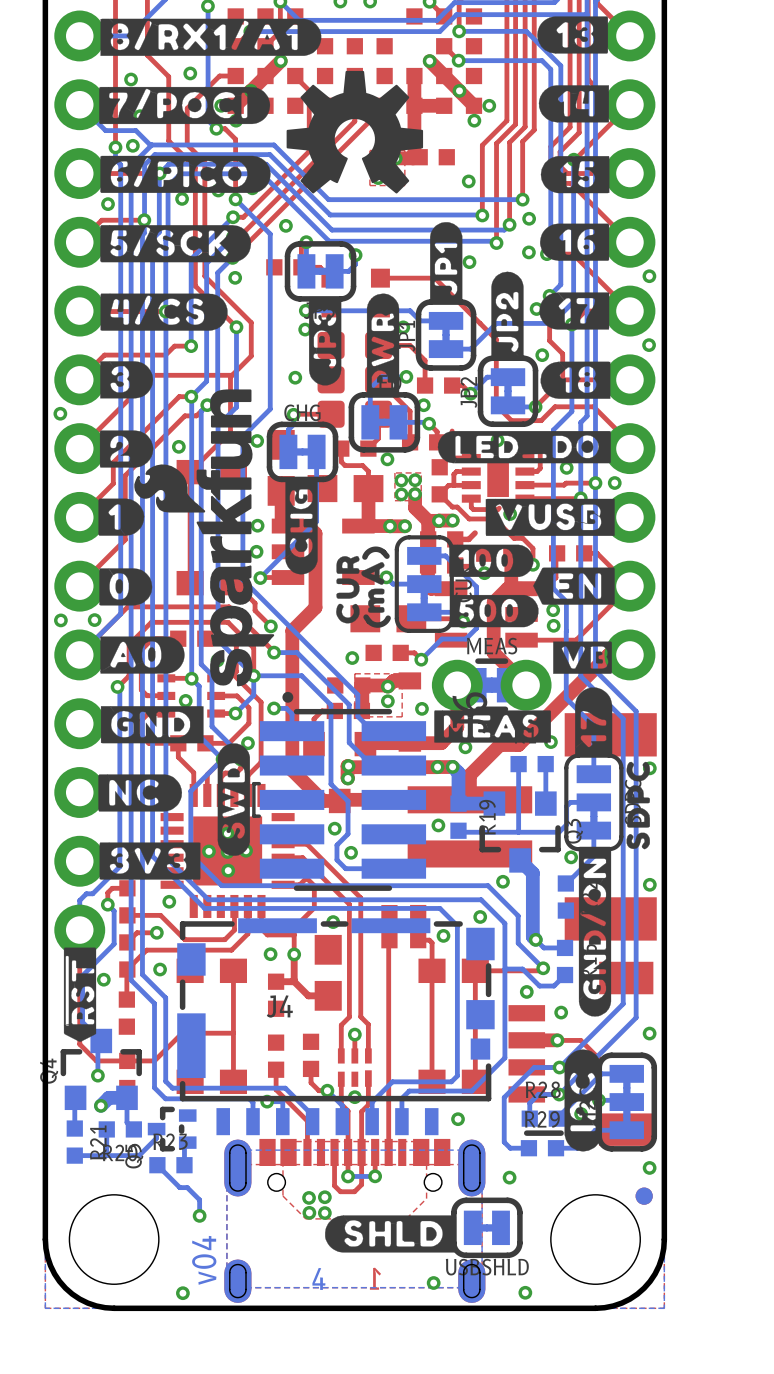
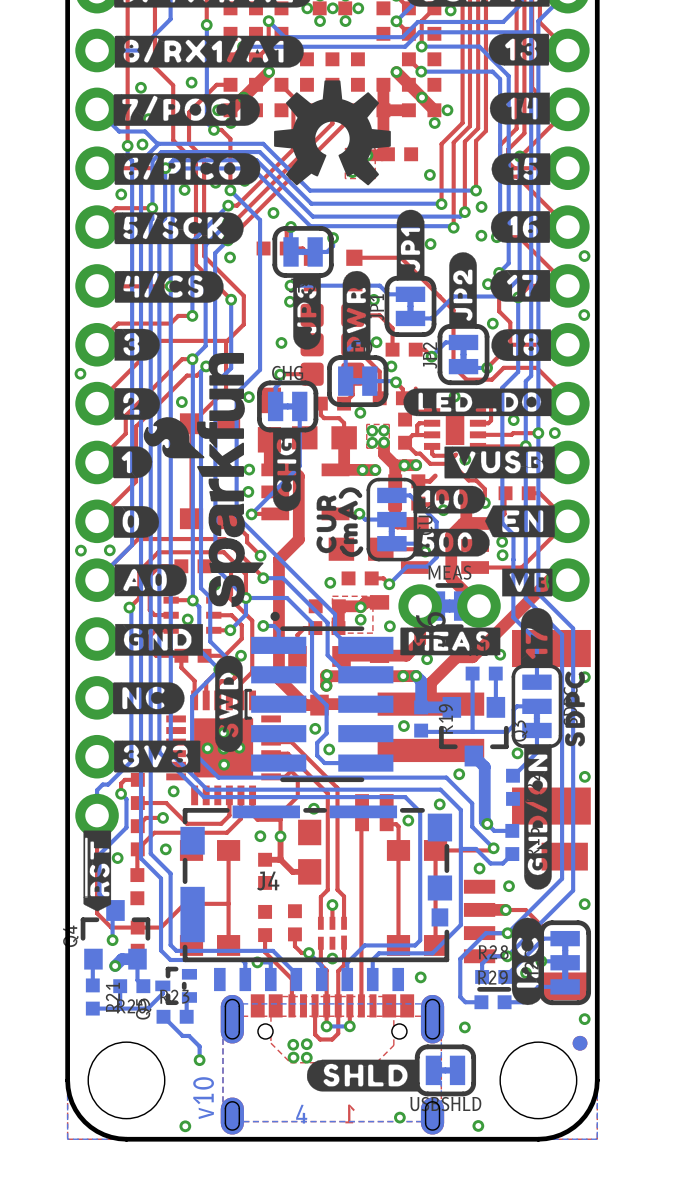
text: v04 (204, 1260) -> v10 (203, 1098)

